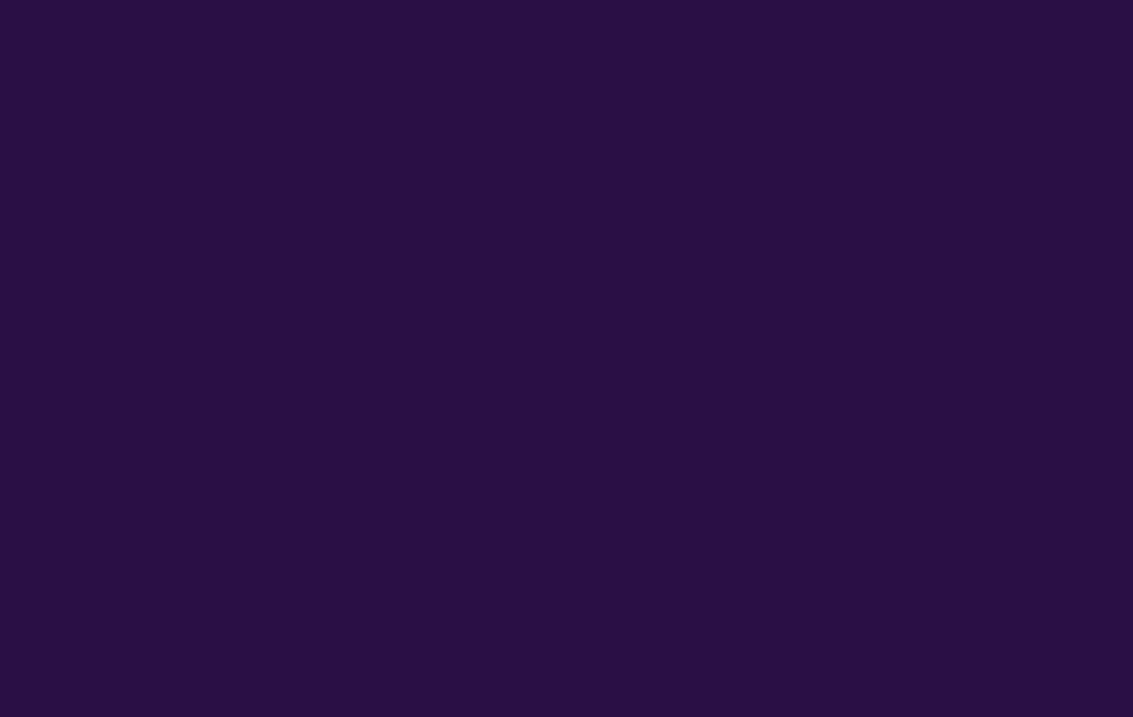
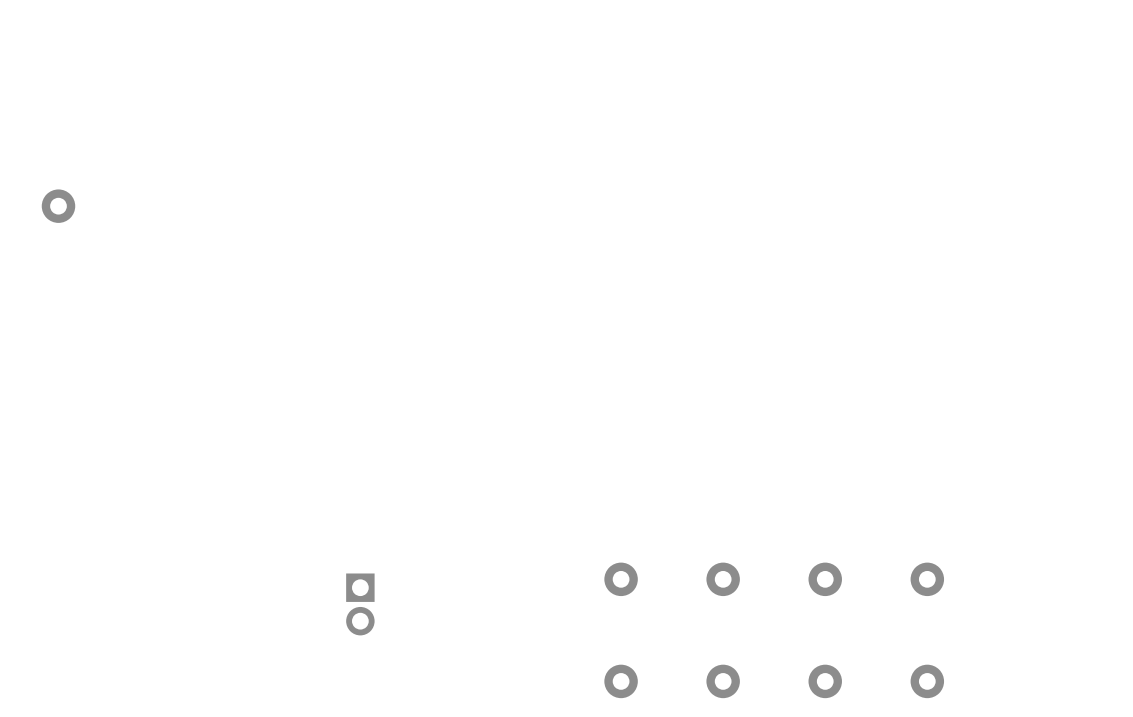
part: none -> (58, 206)
part: none -> (621, 579)
part: none -> (723, 579)
part: none -> (825, 579)
part: none -> (927, 579)
part: none -> (360, 604)
part: none -> (621, 681)
part: none -> (723, 681)
part: none -> (825, 681)
part: none -> (927, 681)

